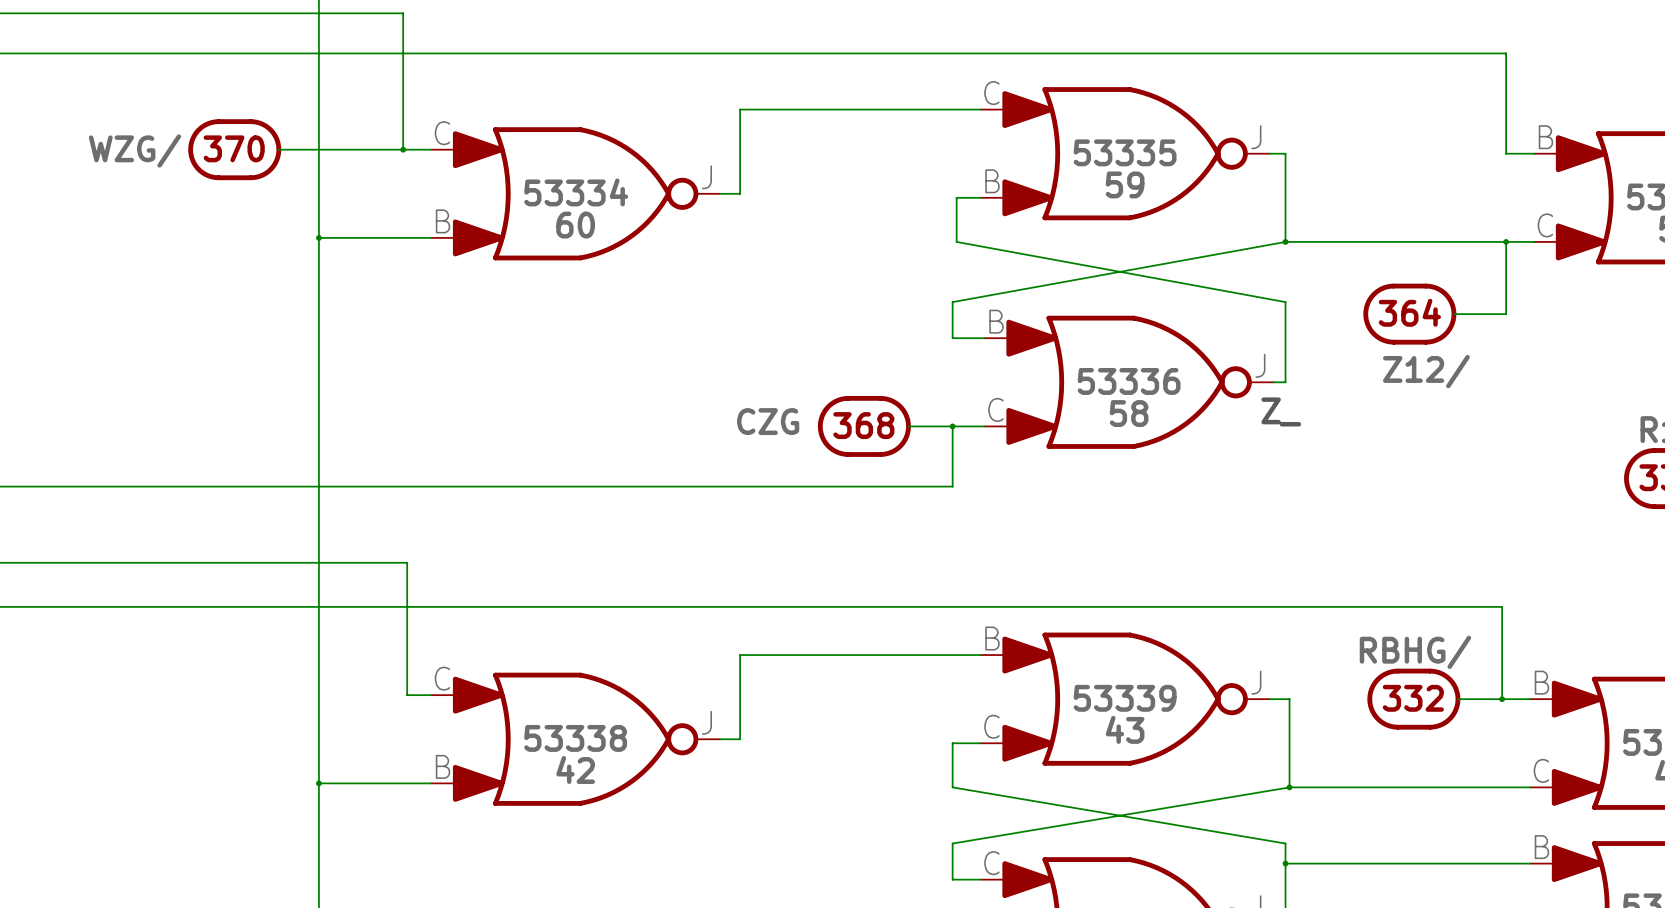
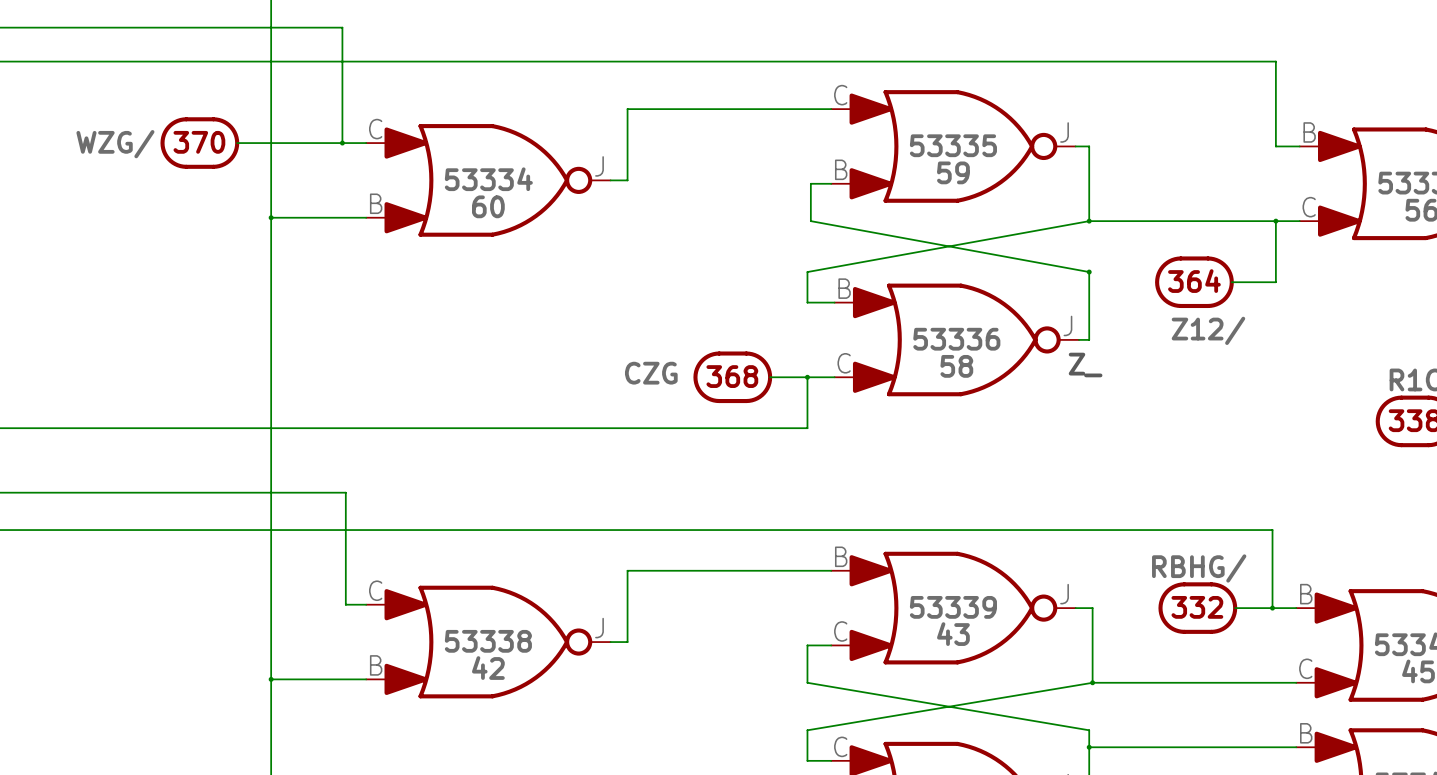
junction: none -> (1089, 272)

